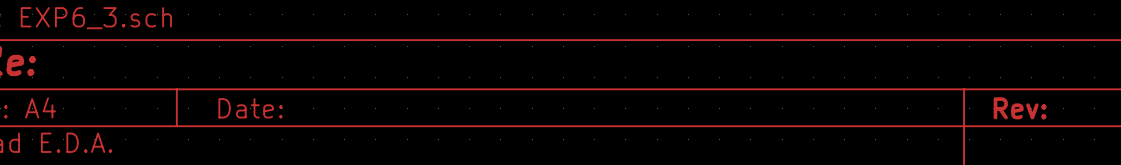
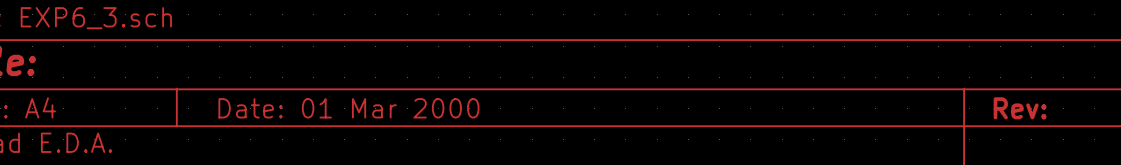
title block: Date: (250, 108) -> Date: 01 Mar 2000 (348, 108)

